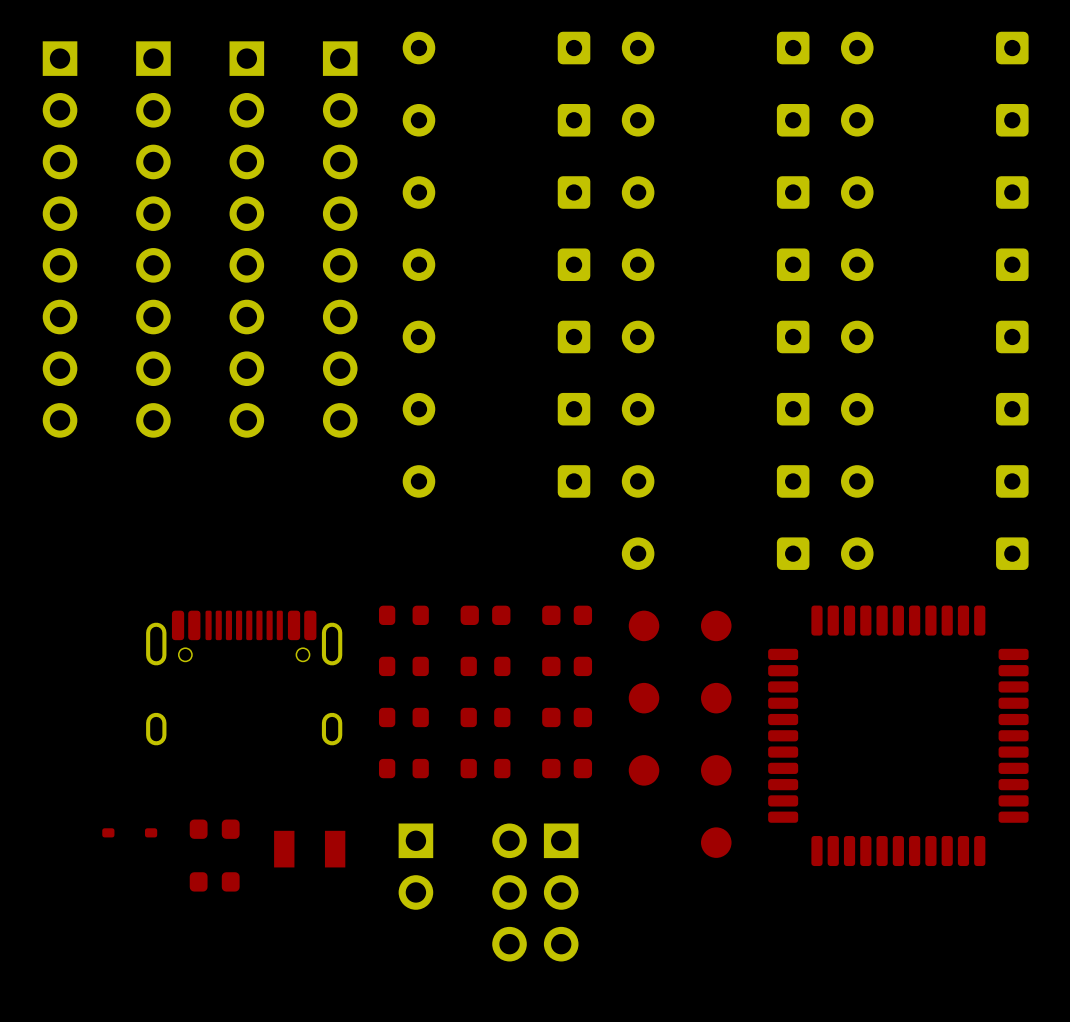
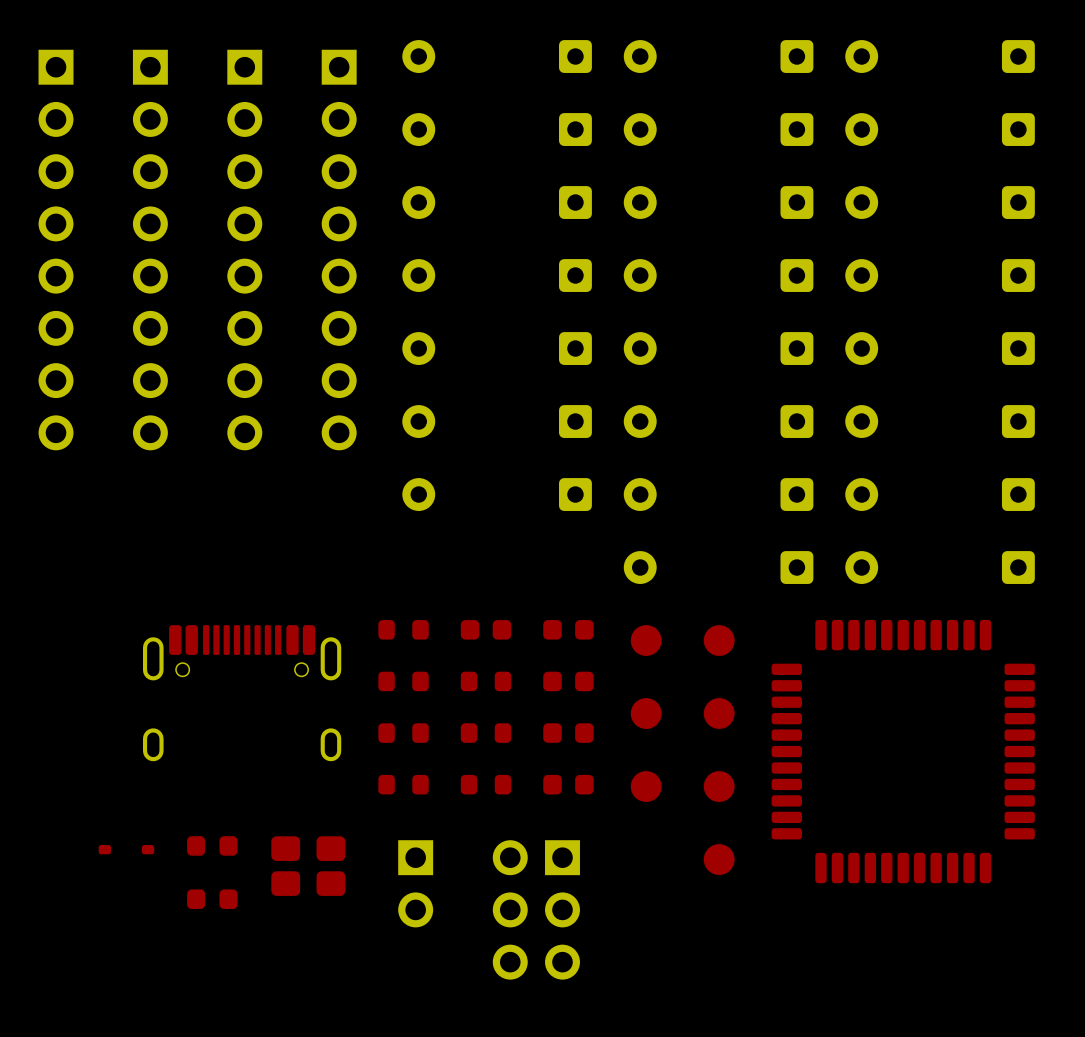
part footprint: [274, 830, 346, 868] -> [271, 836, 346, 896]

